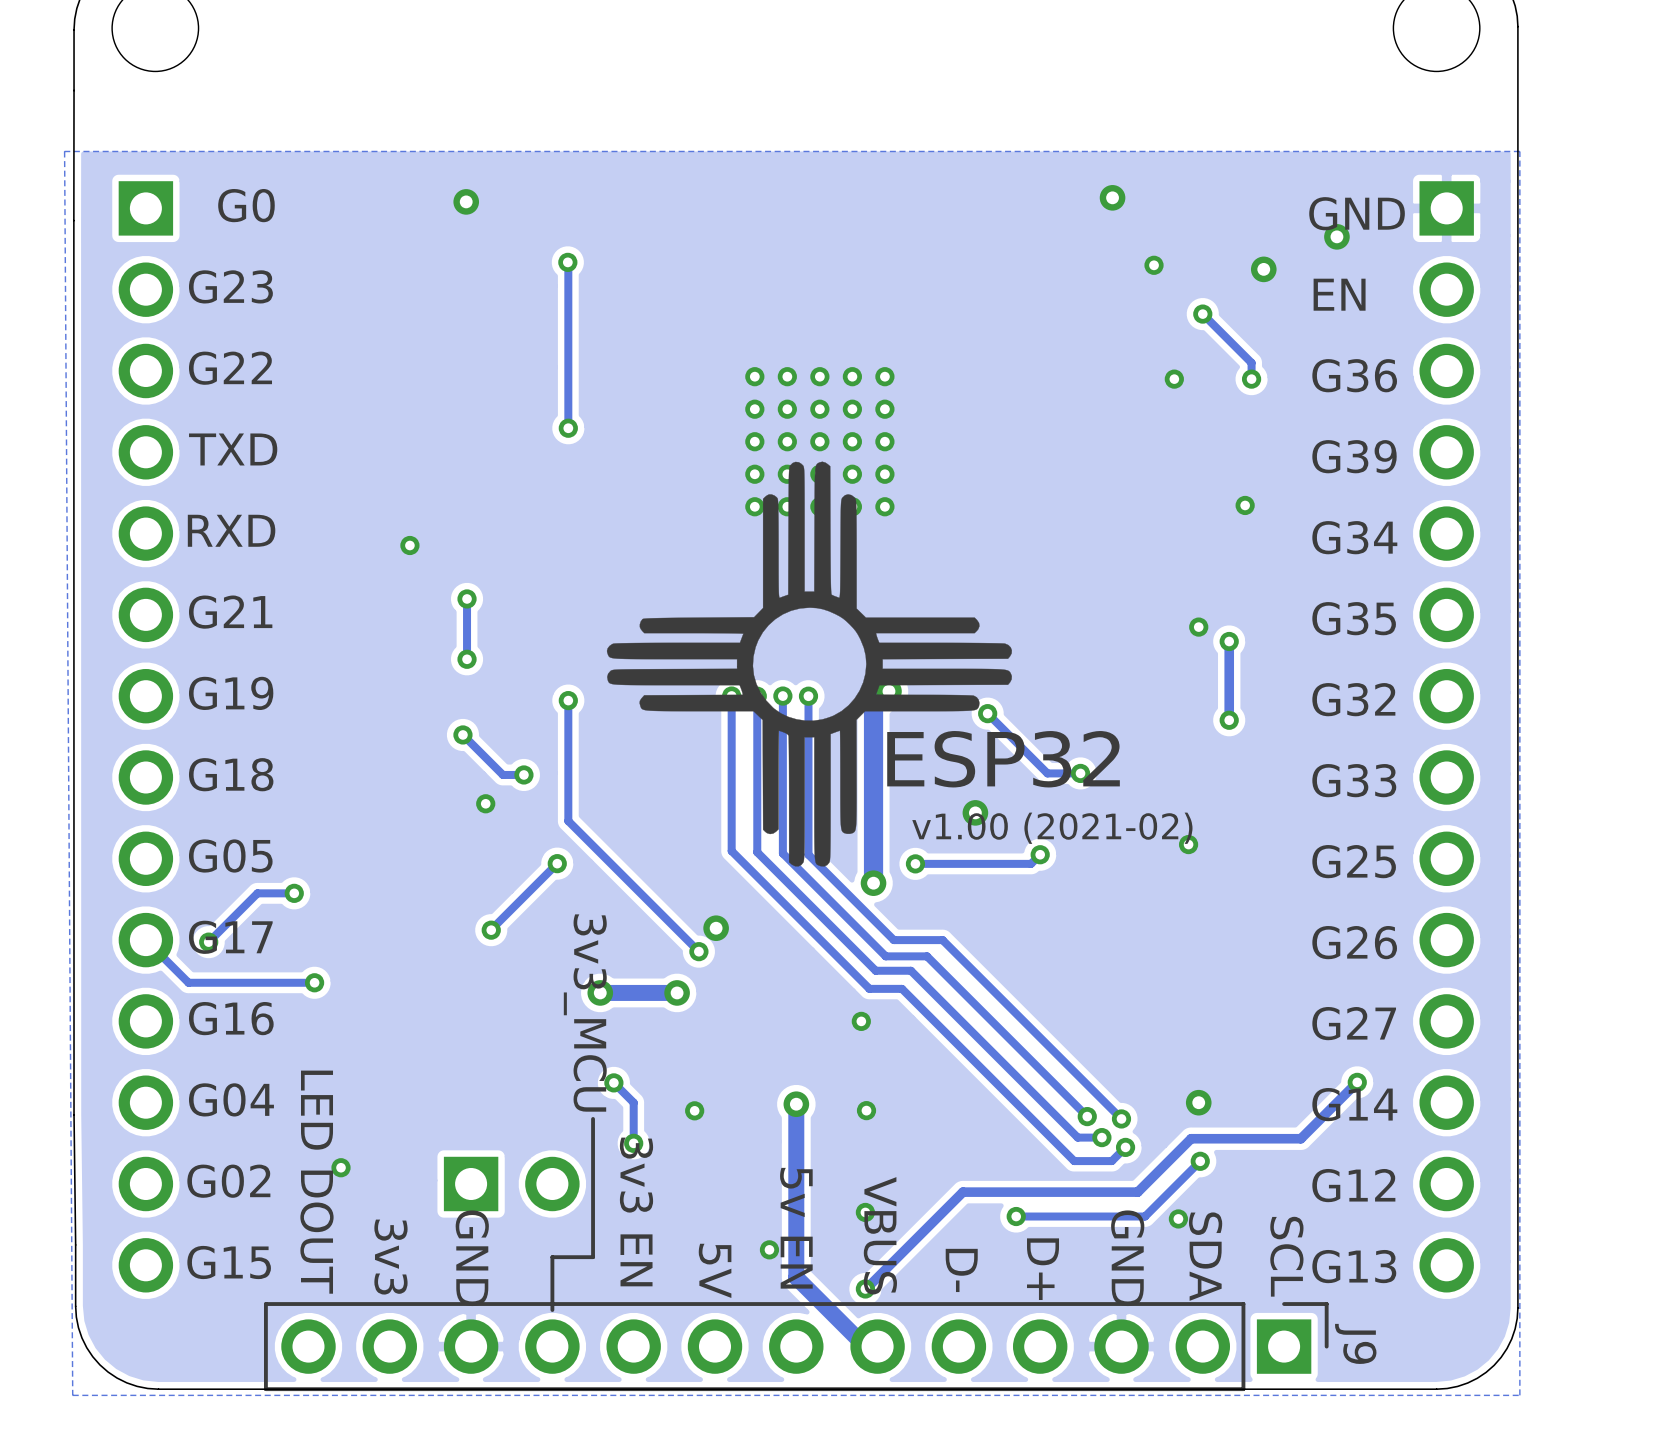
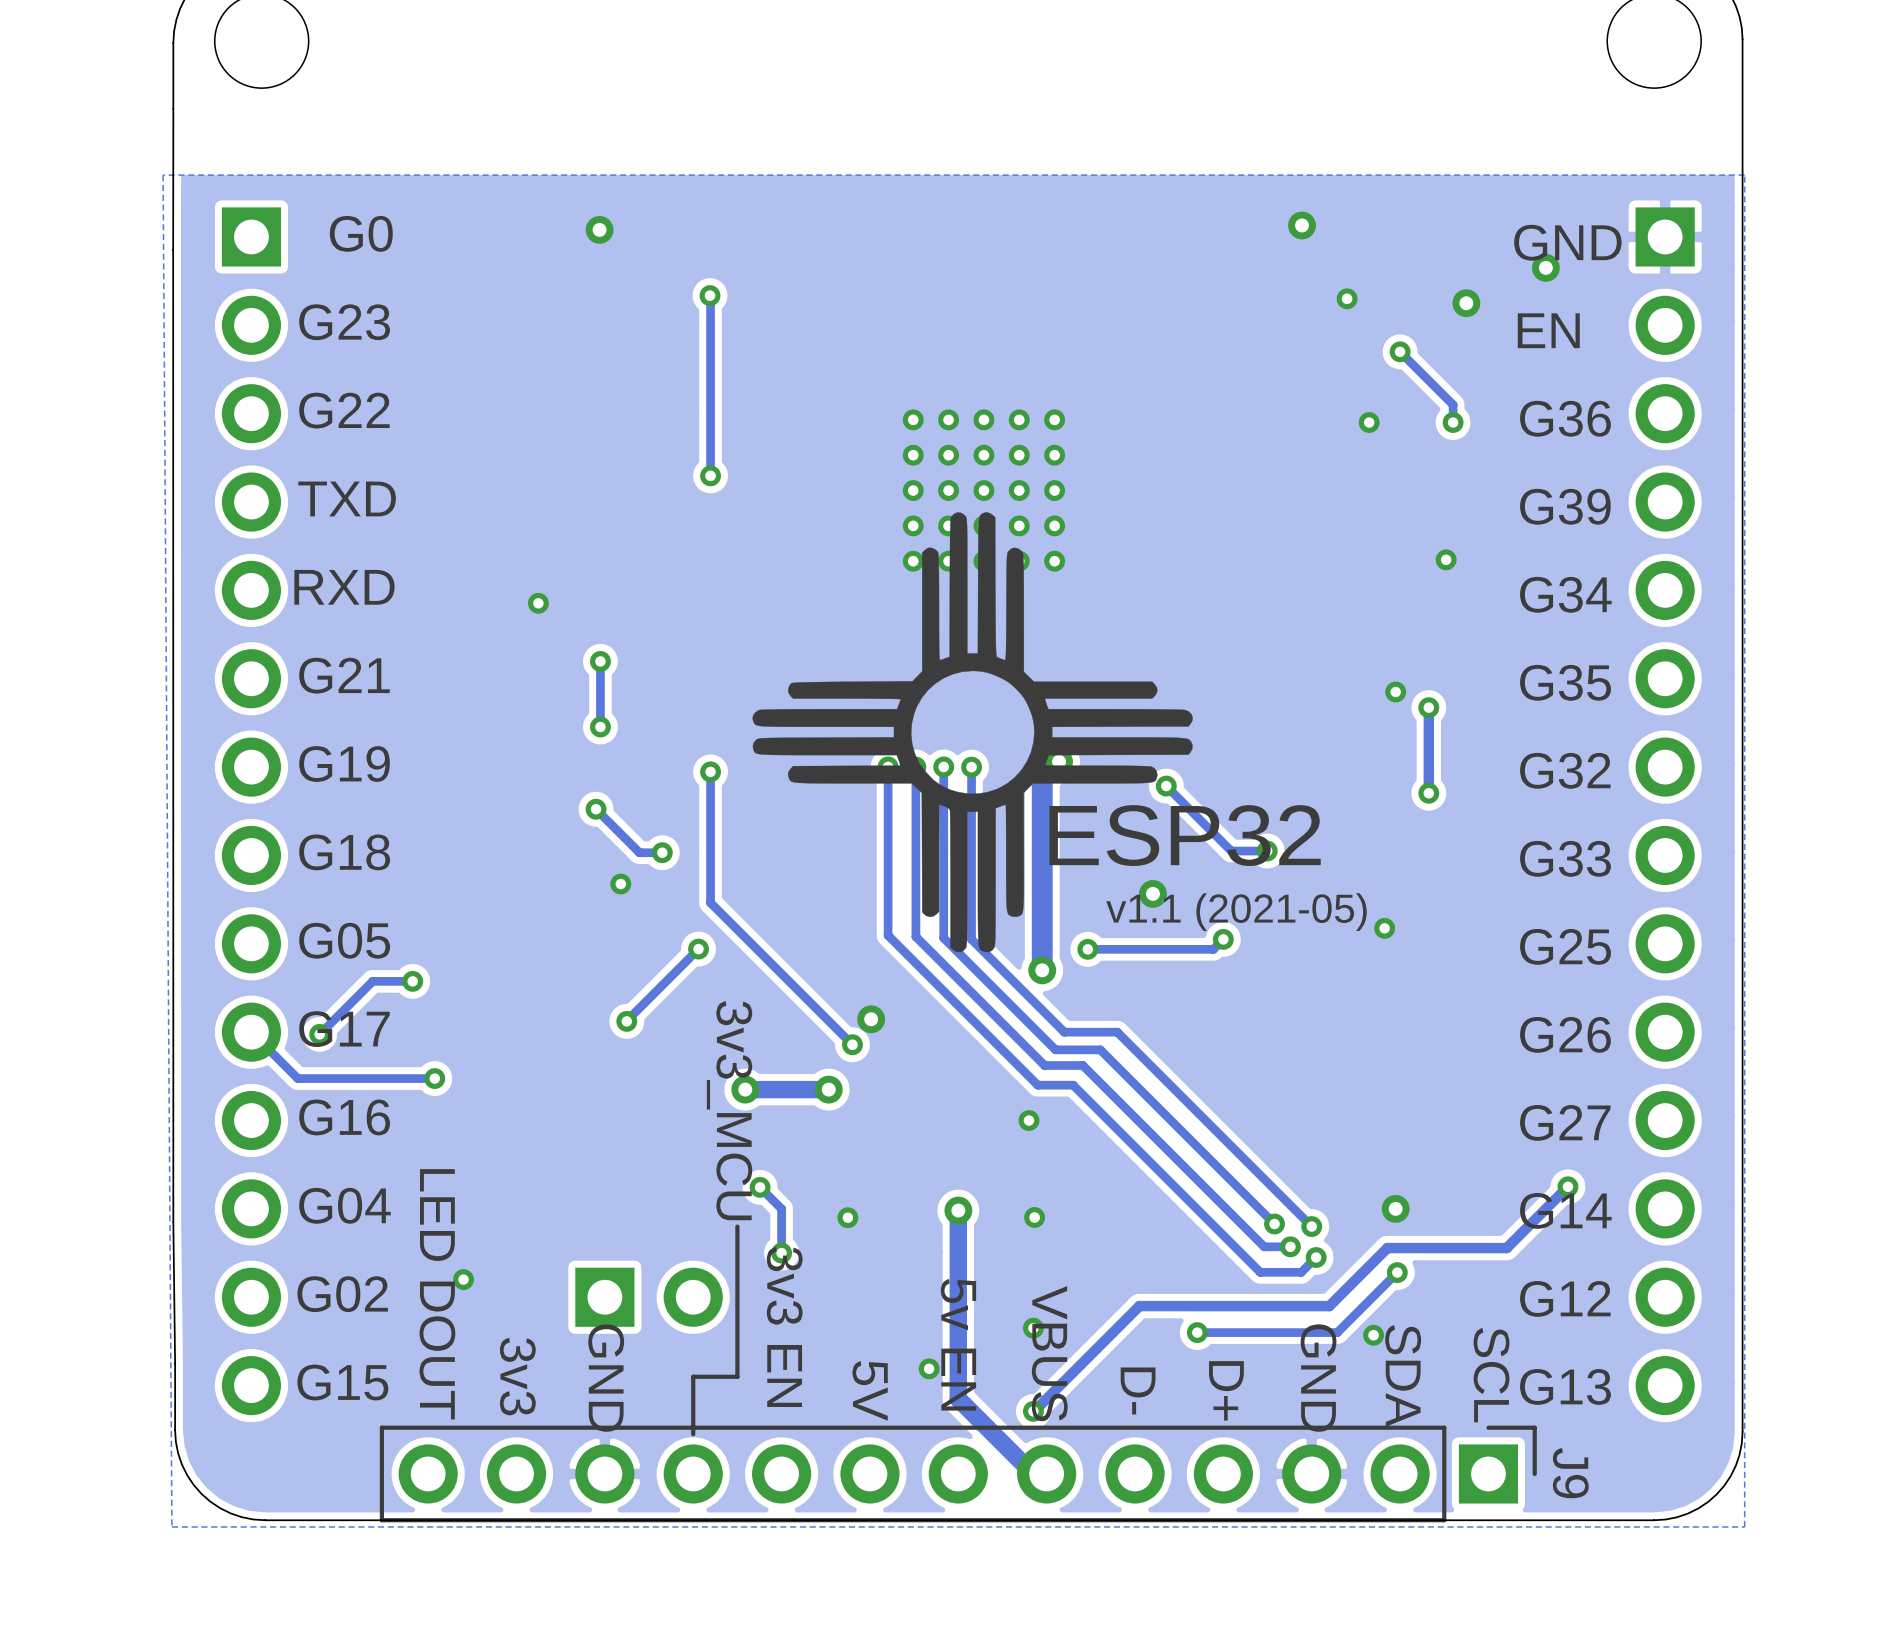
text: v1.00 (2021-02) (1052, 828) -> v1.1 (2021-05) (1236, 912)

